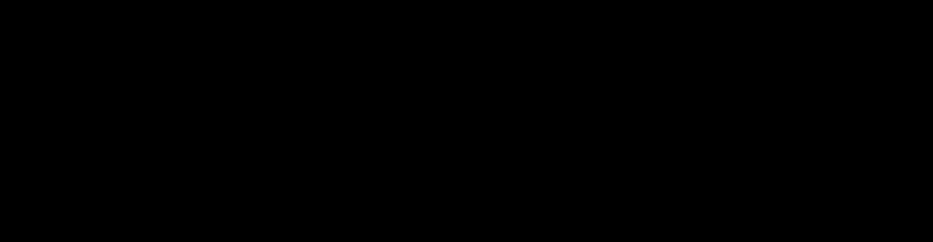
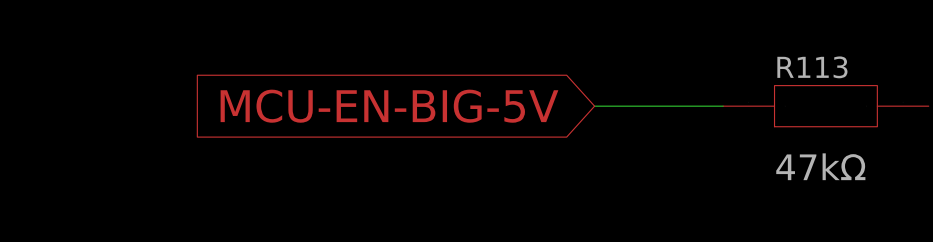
global label: none -> MCU-EN-BIG-5V (389, 106)
wire: none -> (594, 106) (723, 106)
R113: none -> 47kΩ (825, 106)

